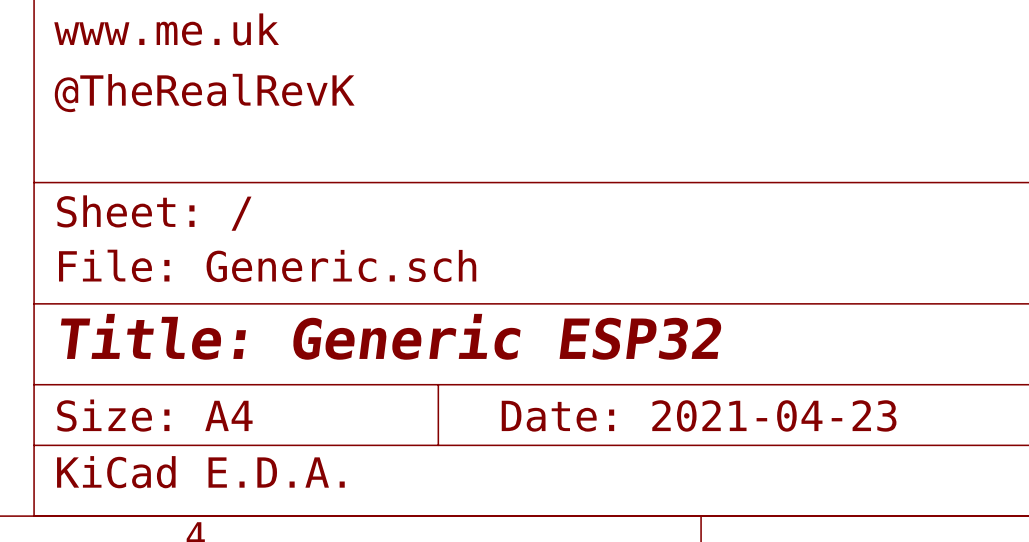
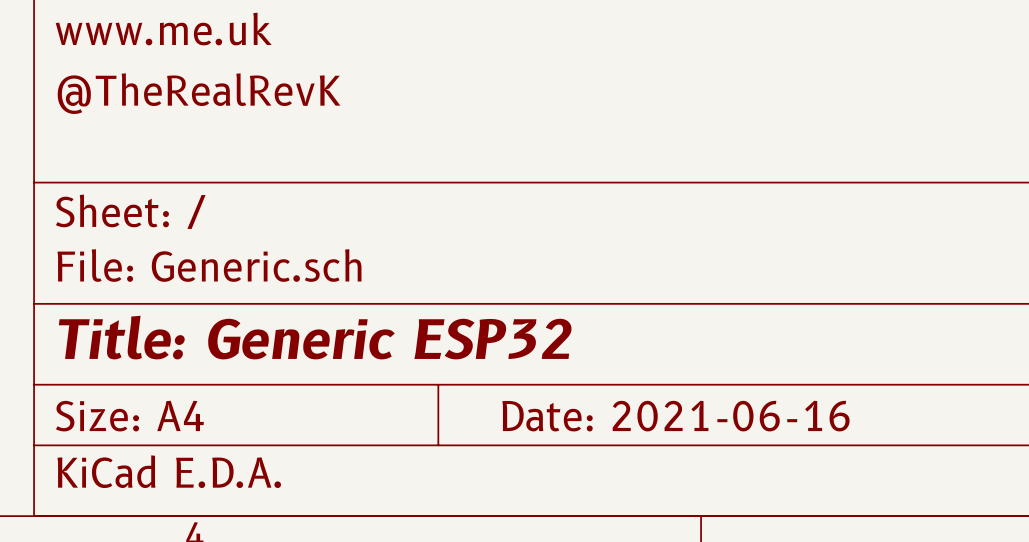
title block: Date: 2021-04-23 (699, 415) -> Date: 2021-06-16 (675, 416)

